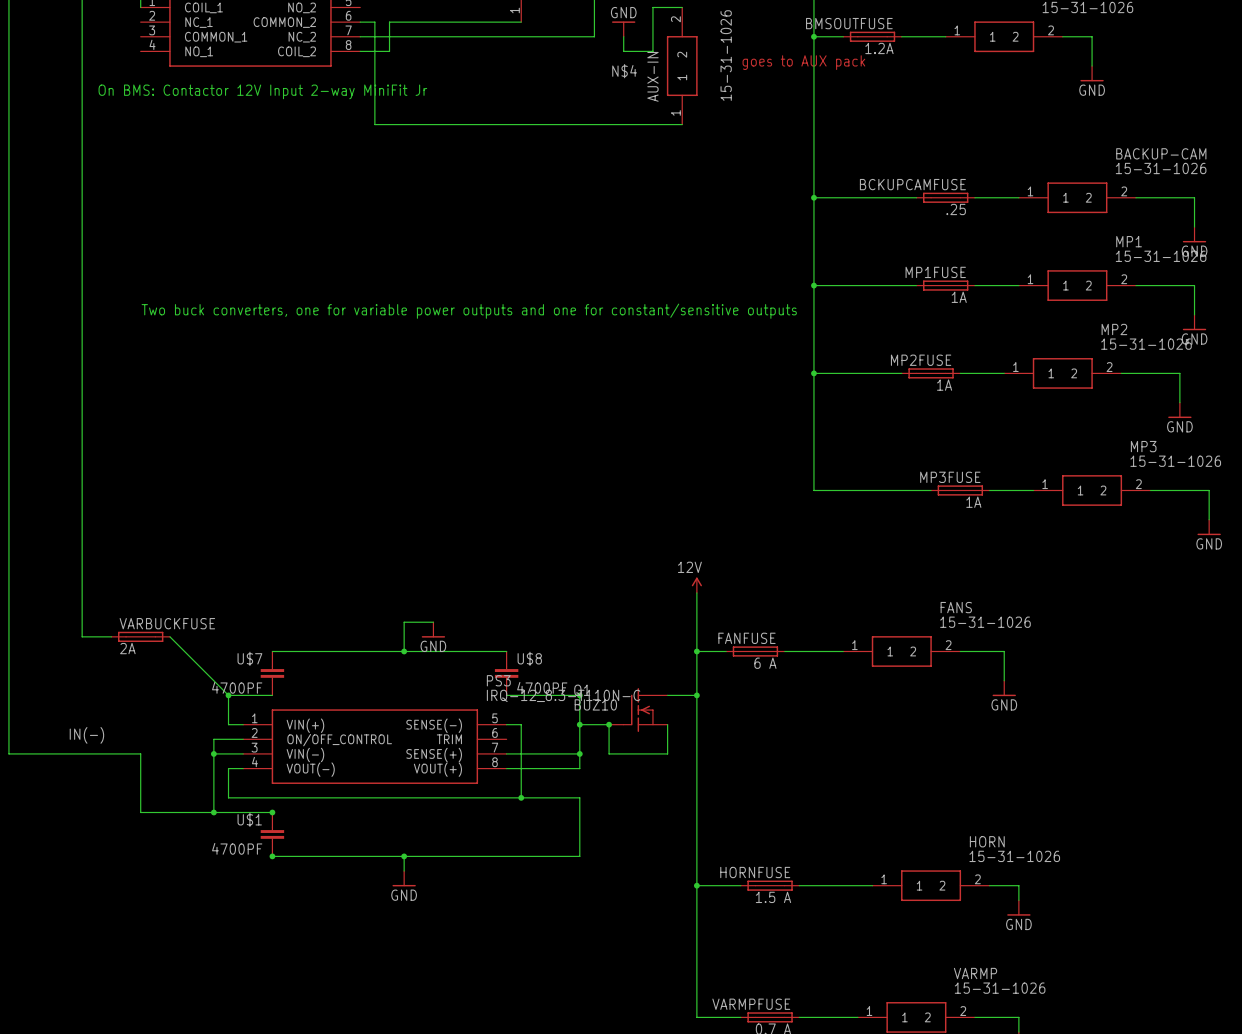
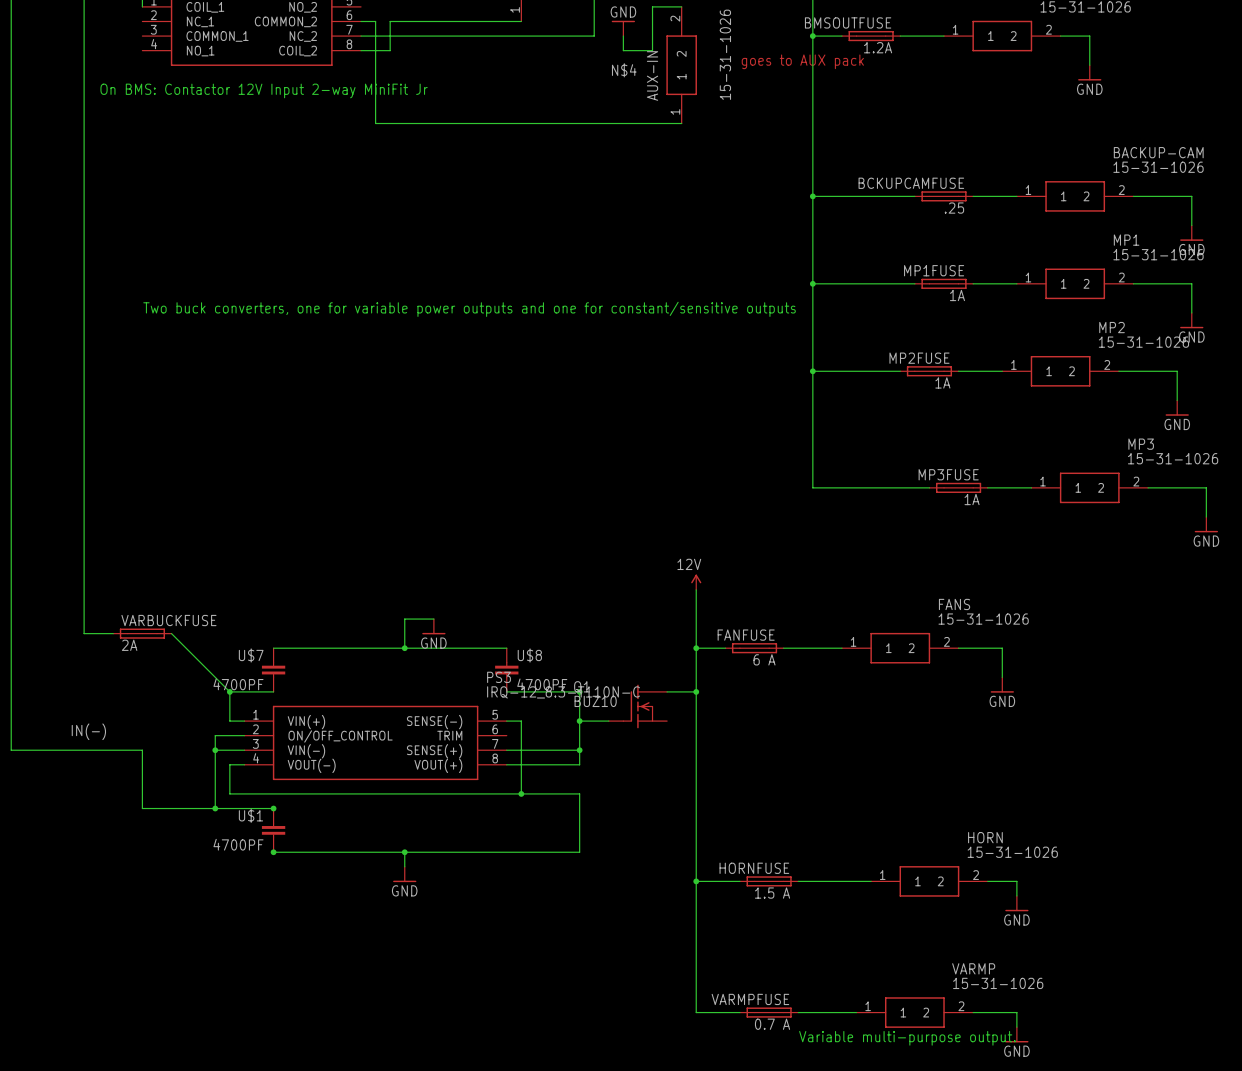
wire: (609, 724) (609, 753) (667, 753) (667, 724) -> none
junction: (609, 724) -> none

